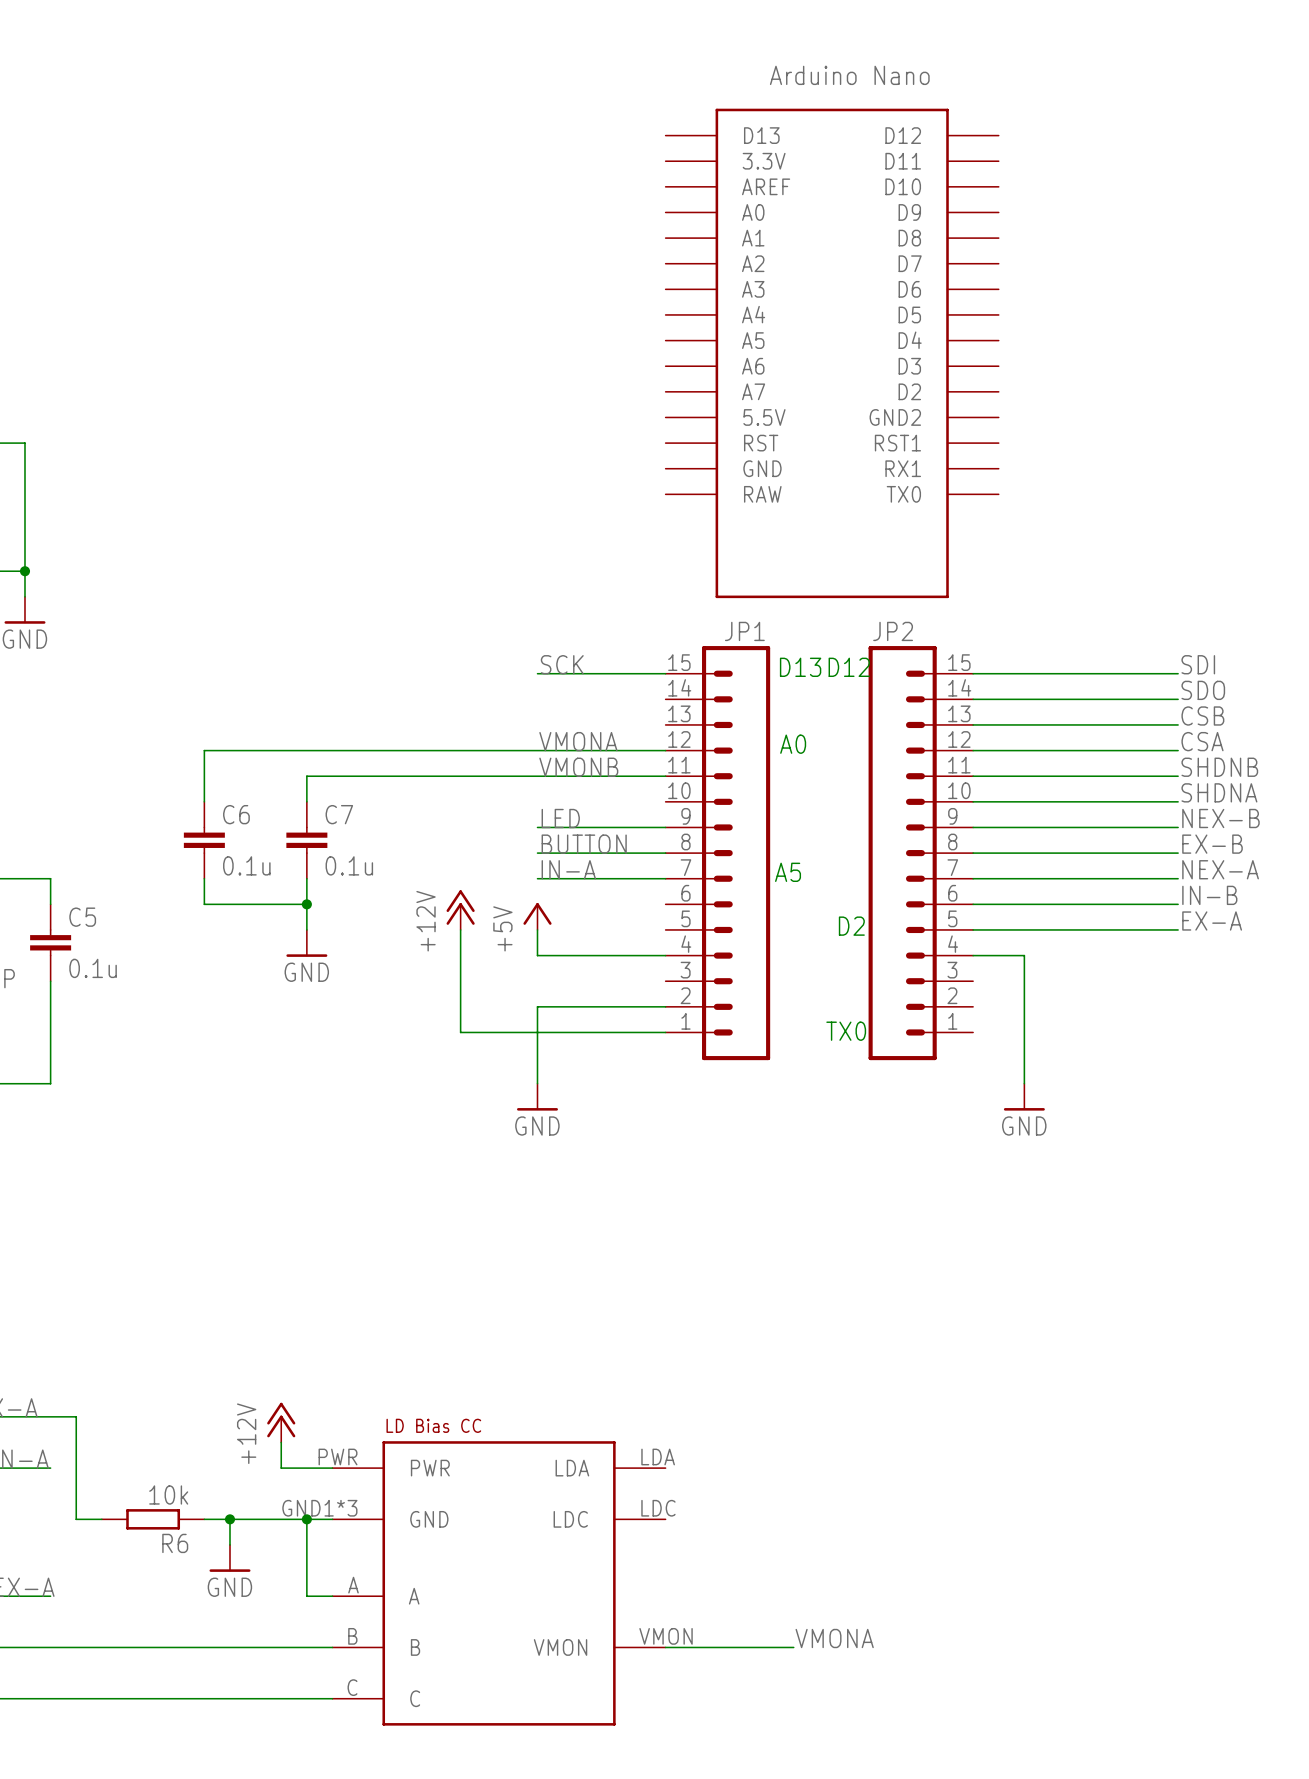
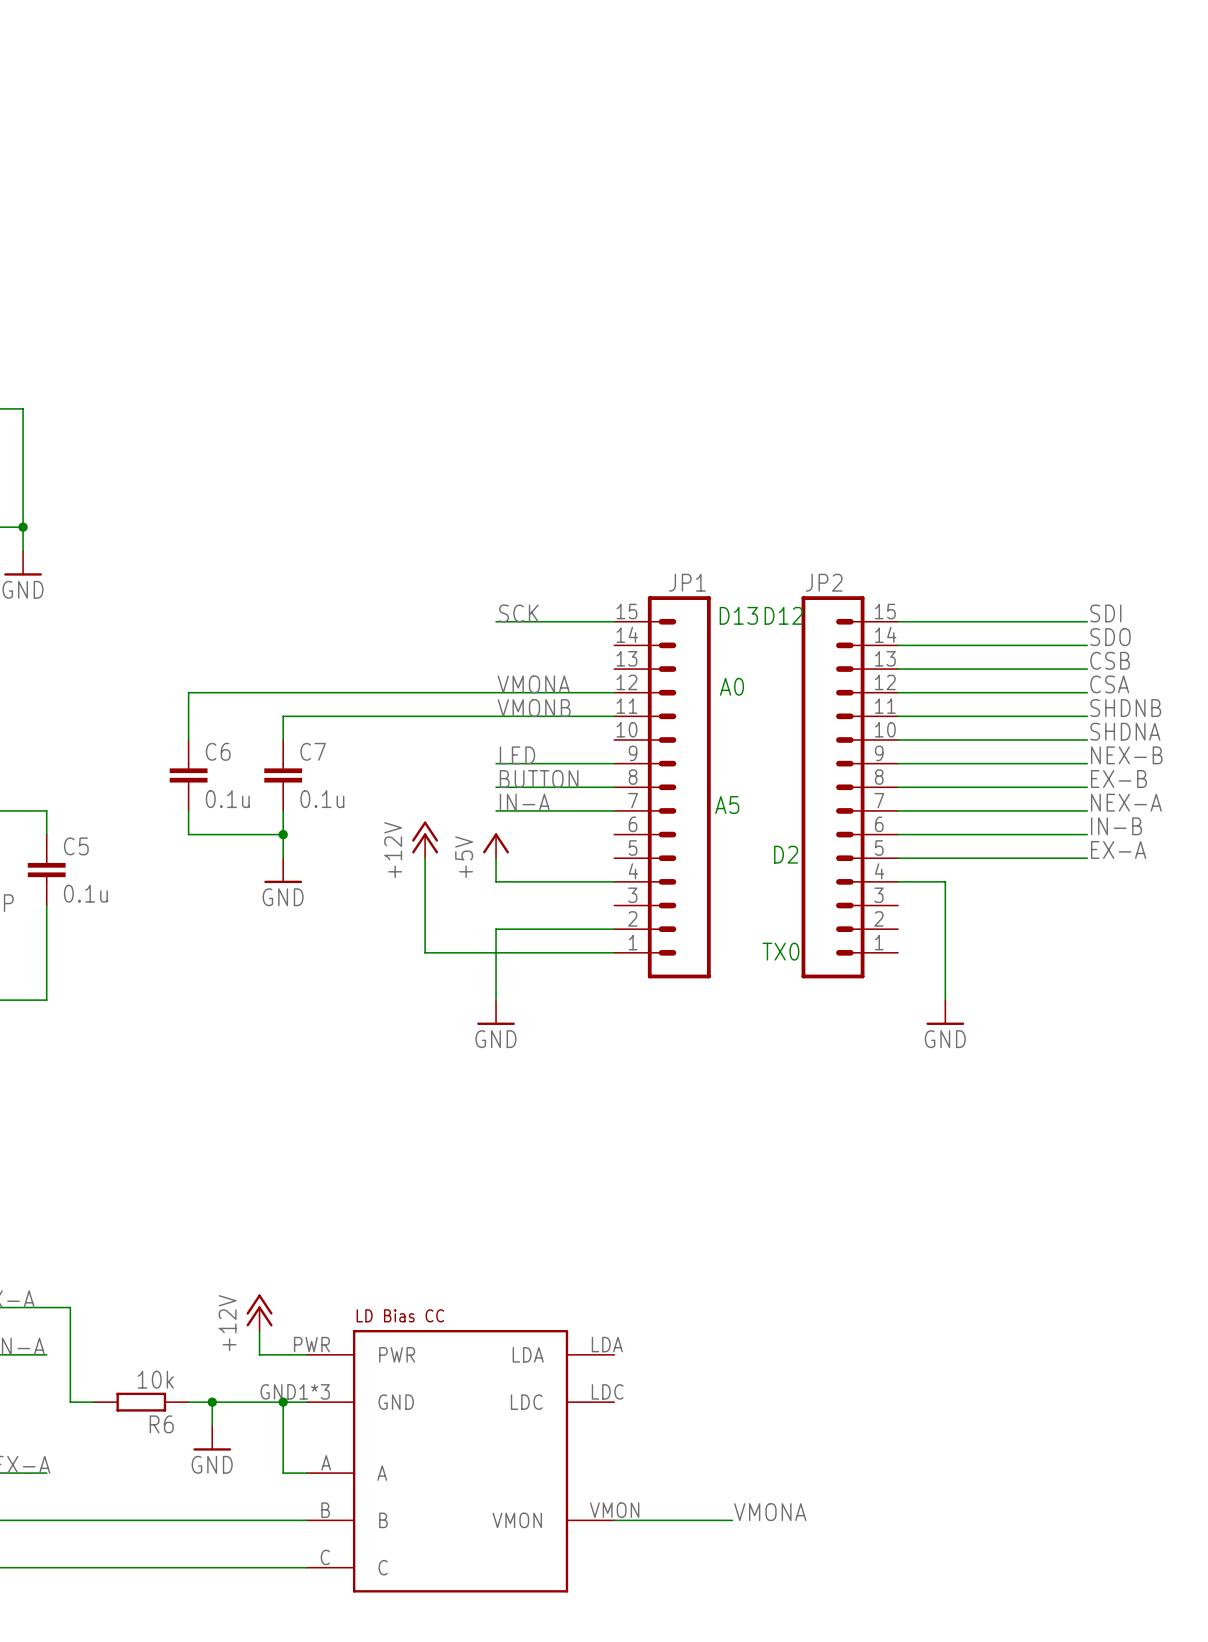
part: (832, 353) -> none

